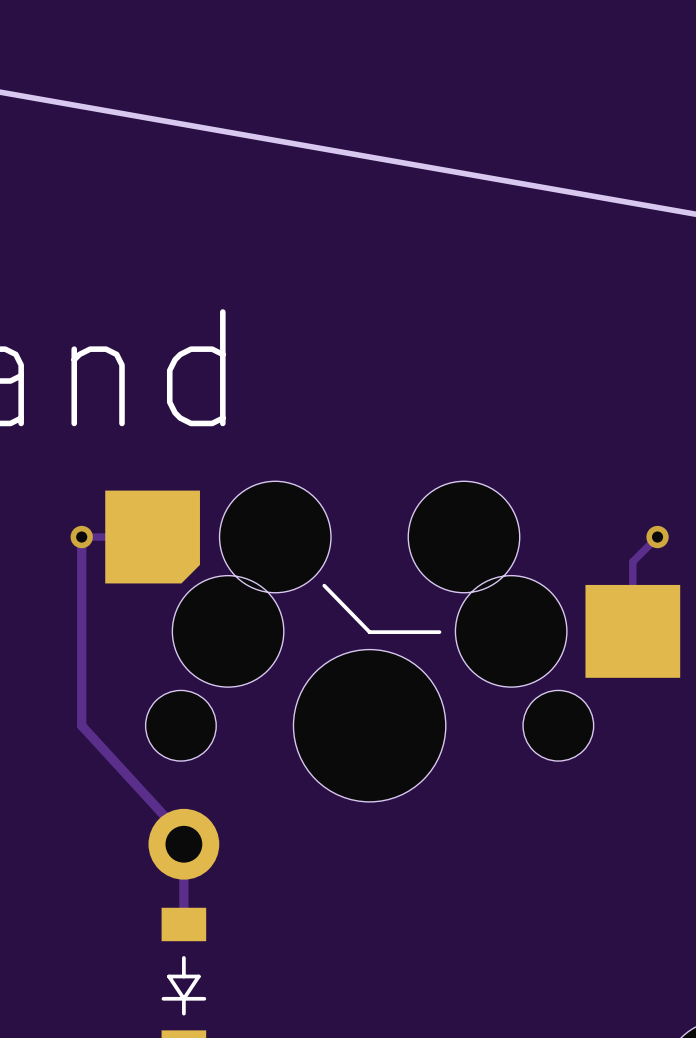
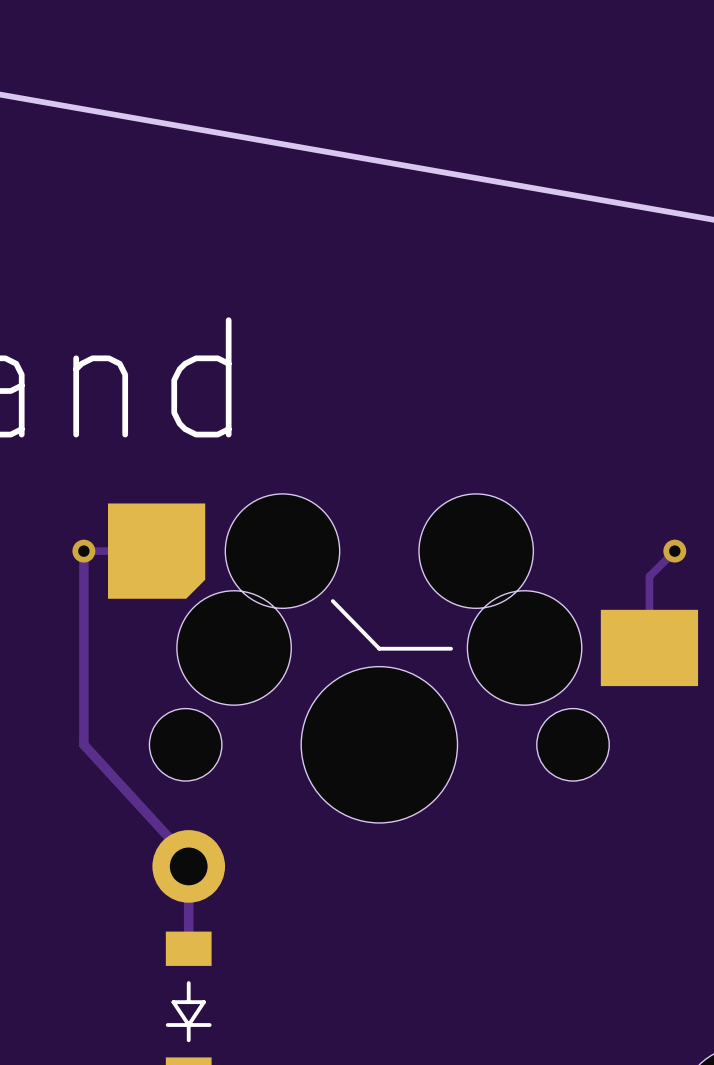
part footprint: [105, 481, 681, 802] -> [108, 493, 699, 823]

